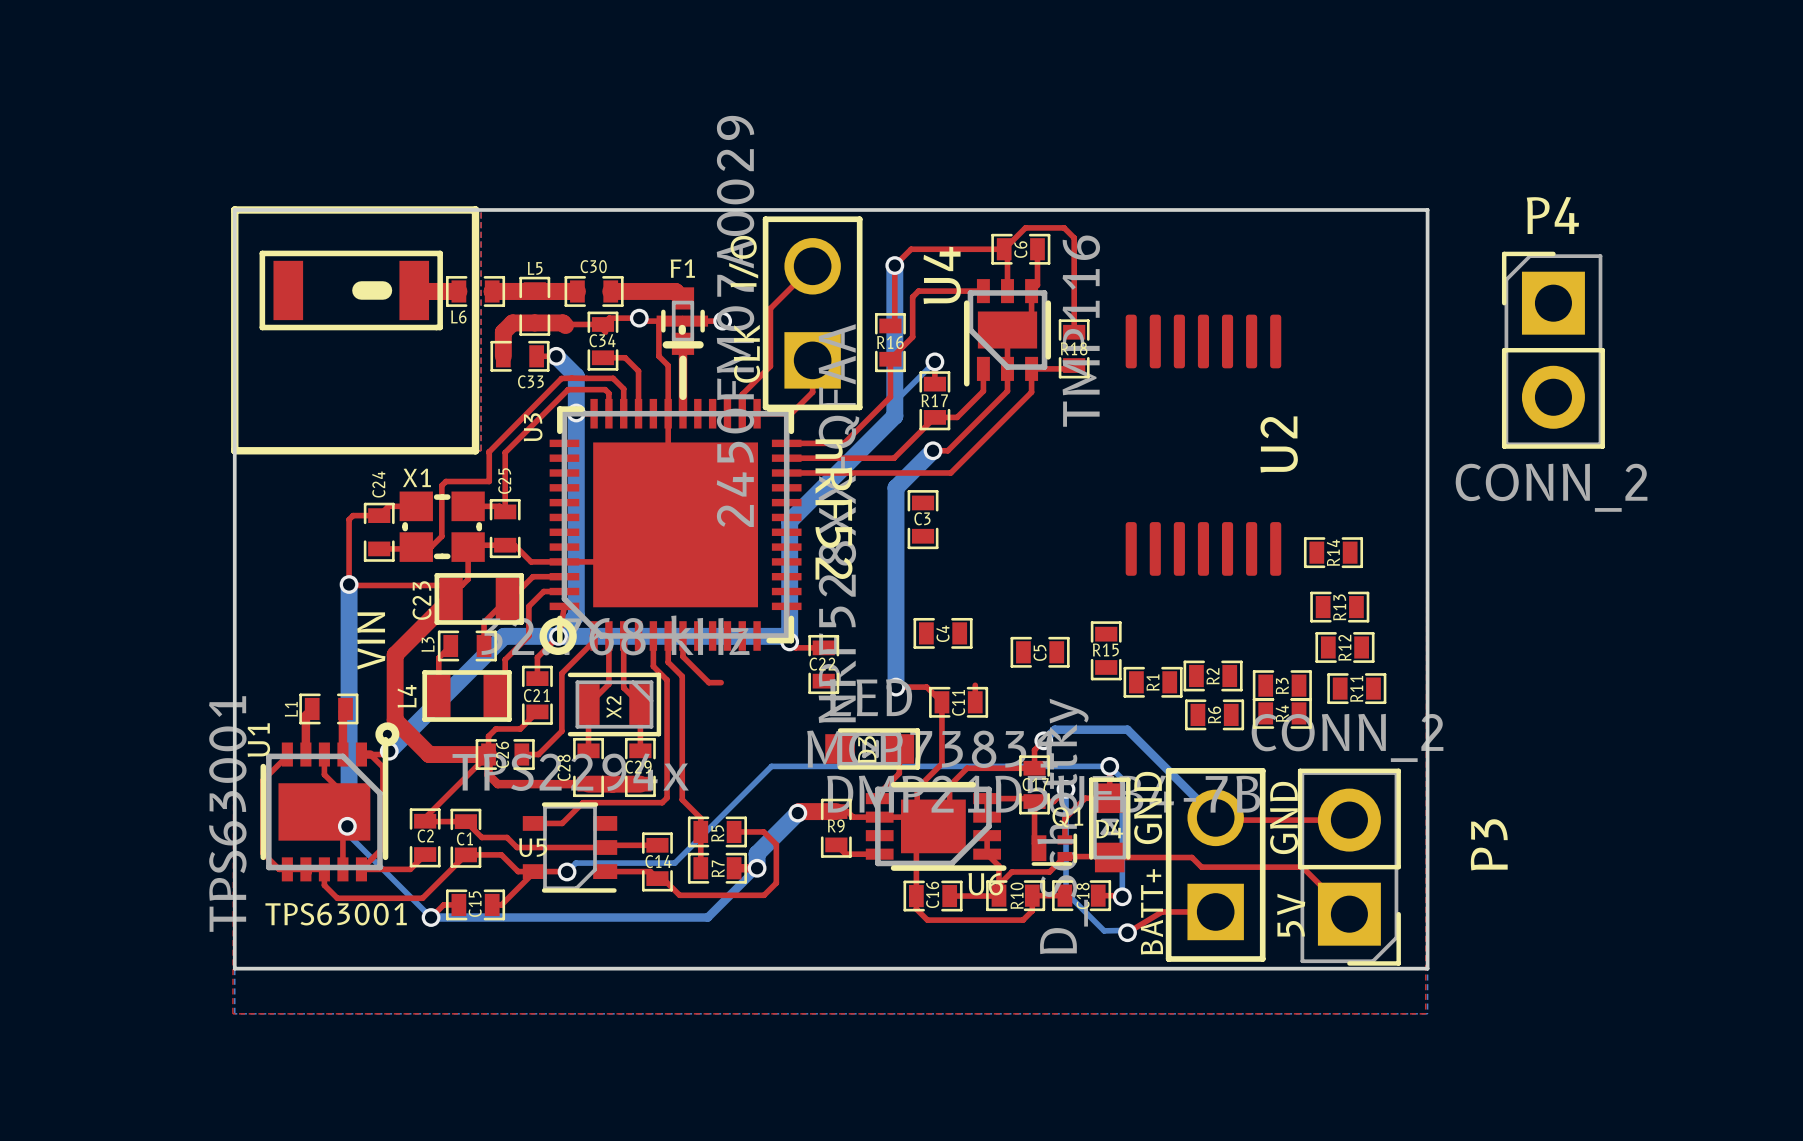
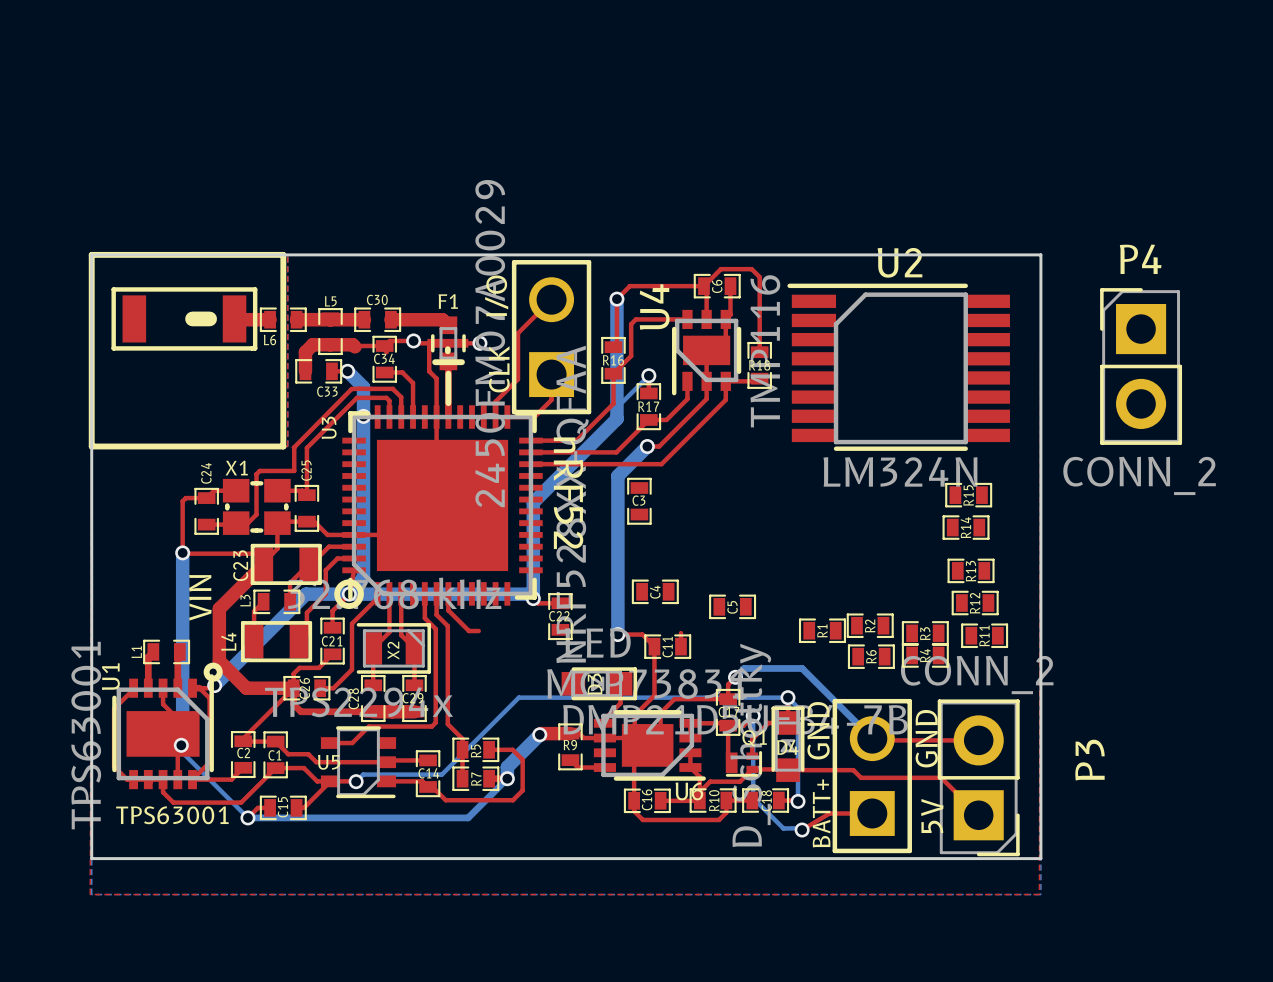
U2 footprint: [1125, 314, 1282, 576] -> [787, 283, 1010, 451]
U2 name position: U2 (1279, 444) -> U2 (899, 262)
U2 value: none -> LM324N (900, 471)
R15 rotation: 0° (1106, 650) -> 90° clockwise (968, 495)
R15 position: (1106, 650) -> (968, 495)

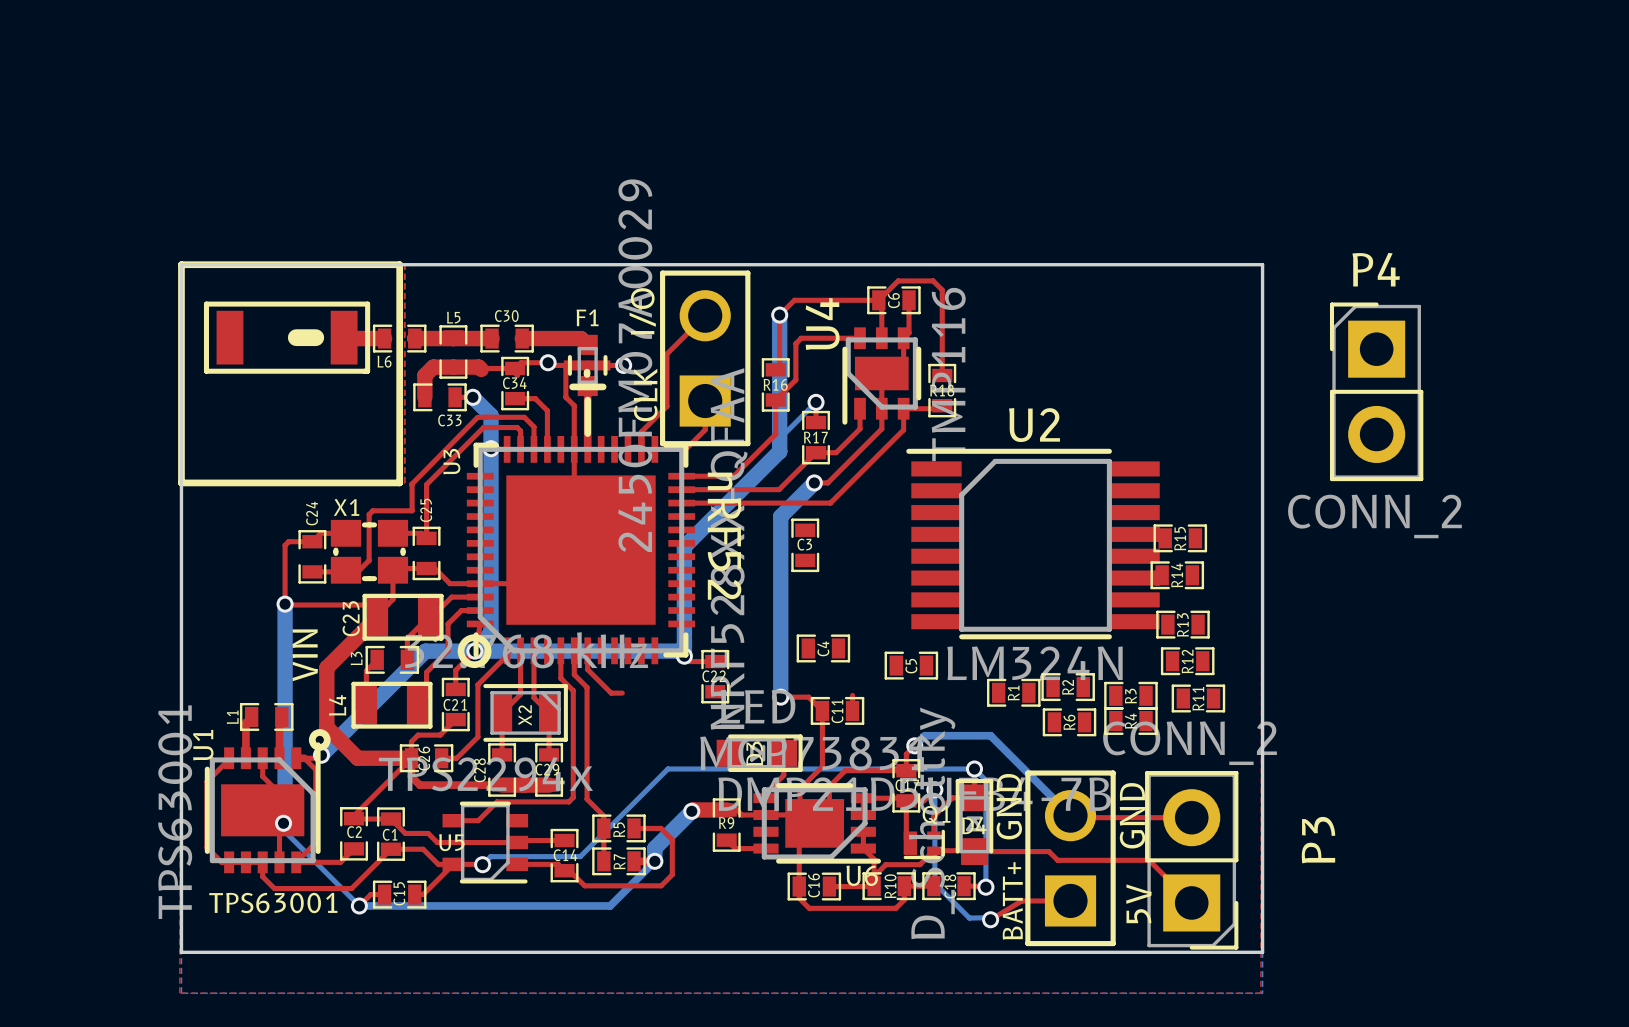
U2 position: (898, 367) -> (1033, 544)

